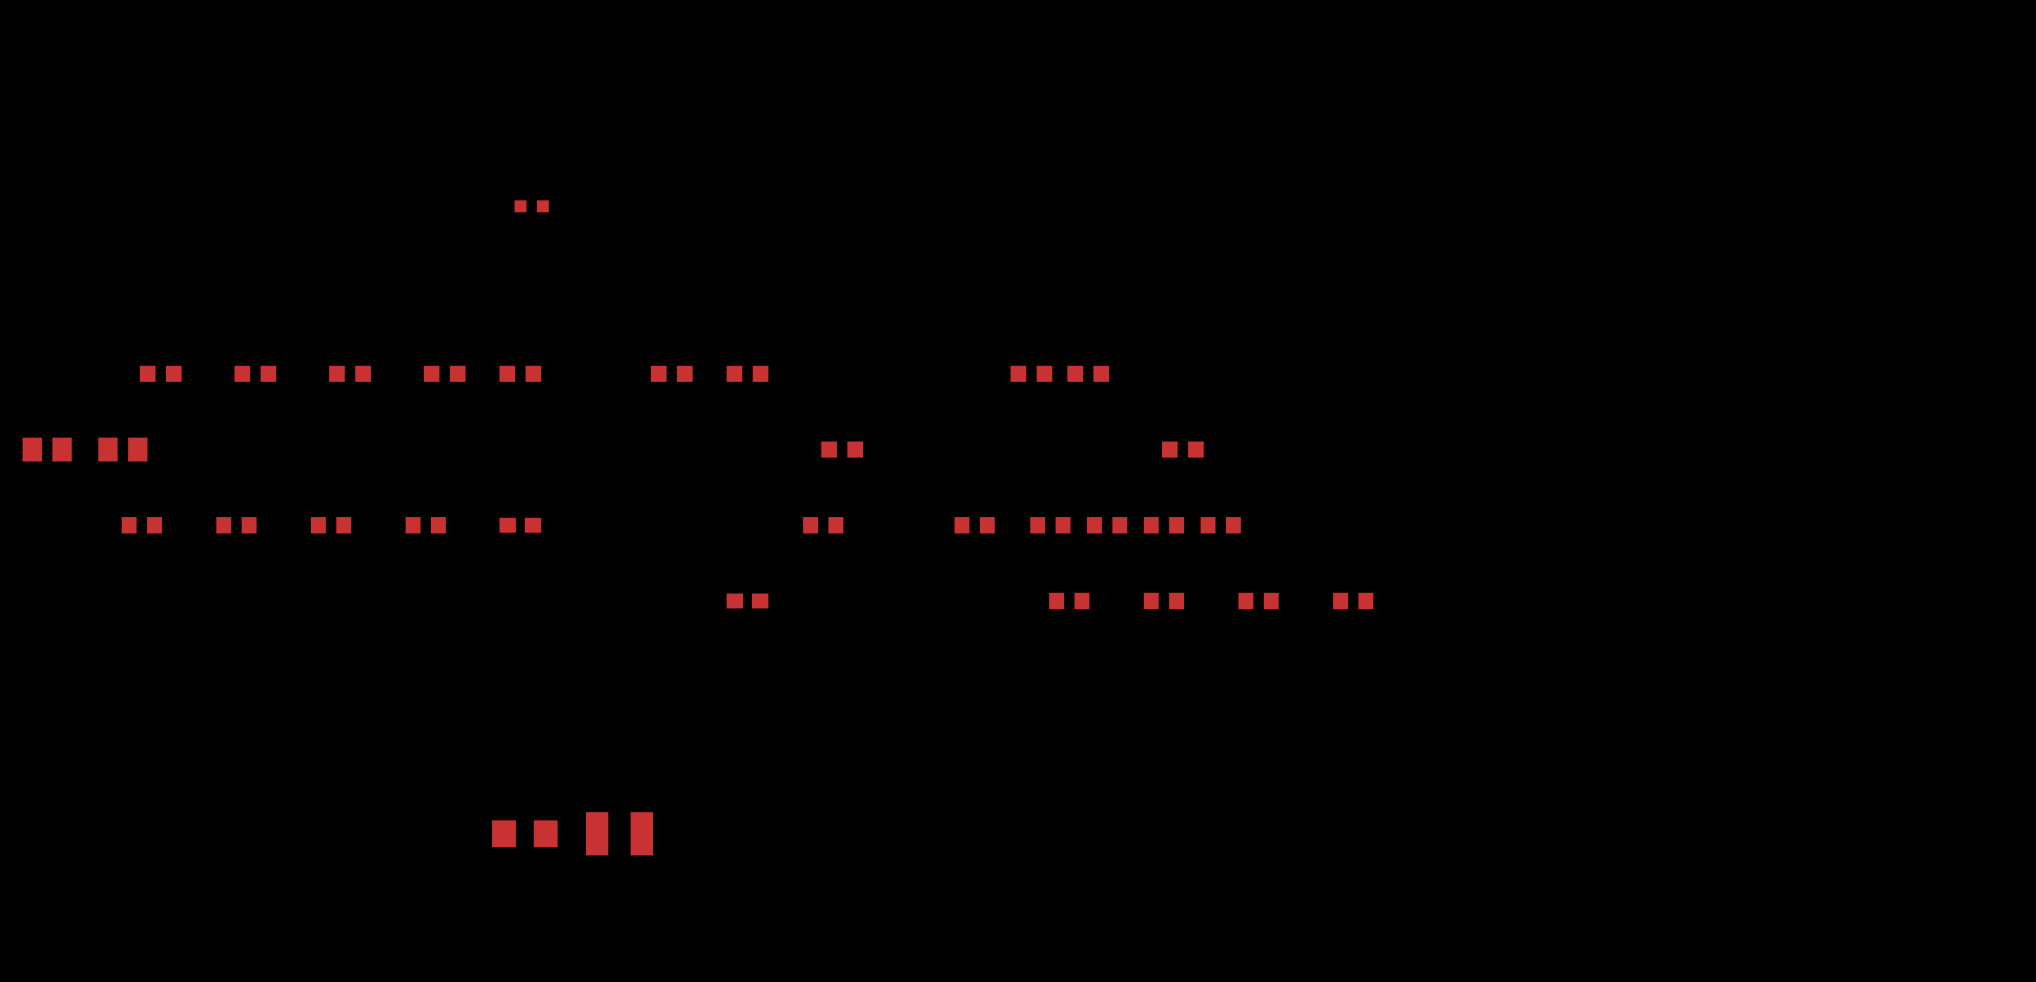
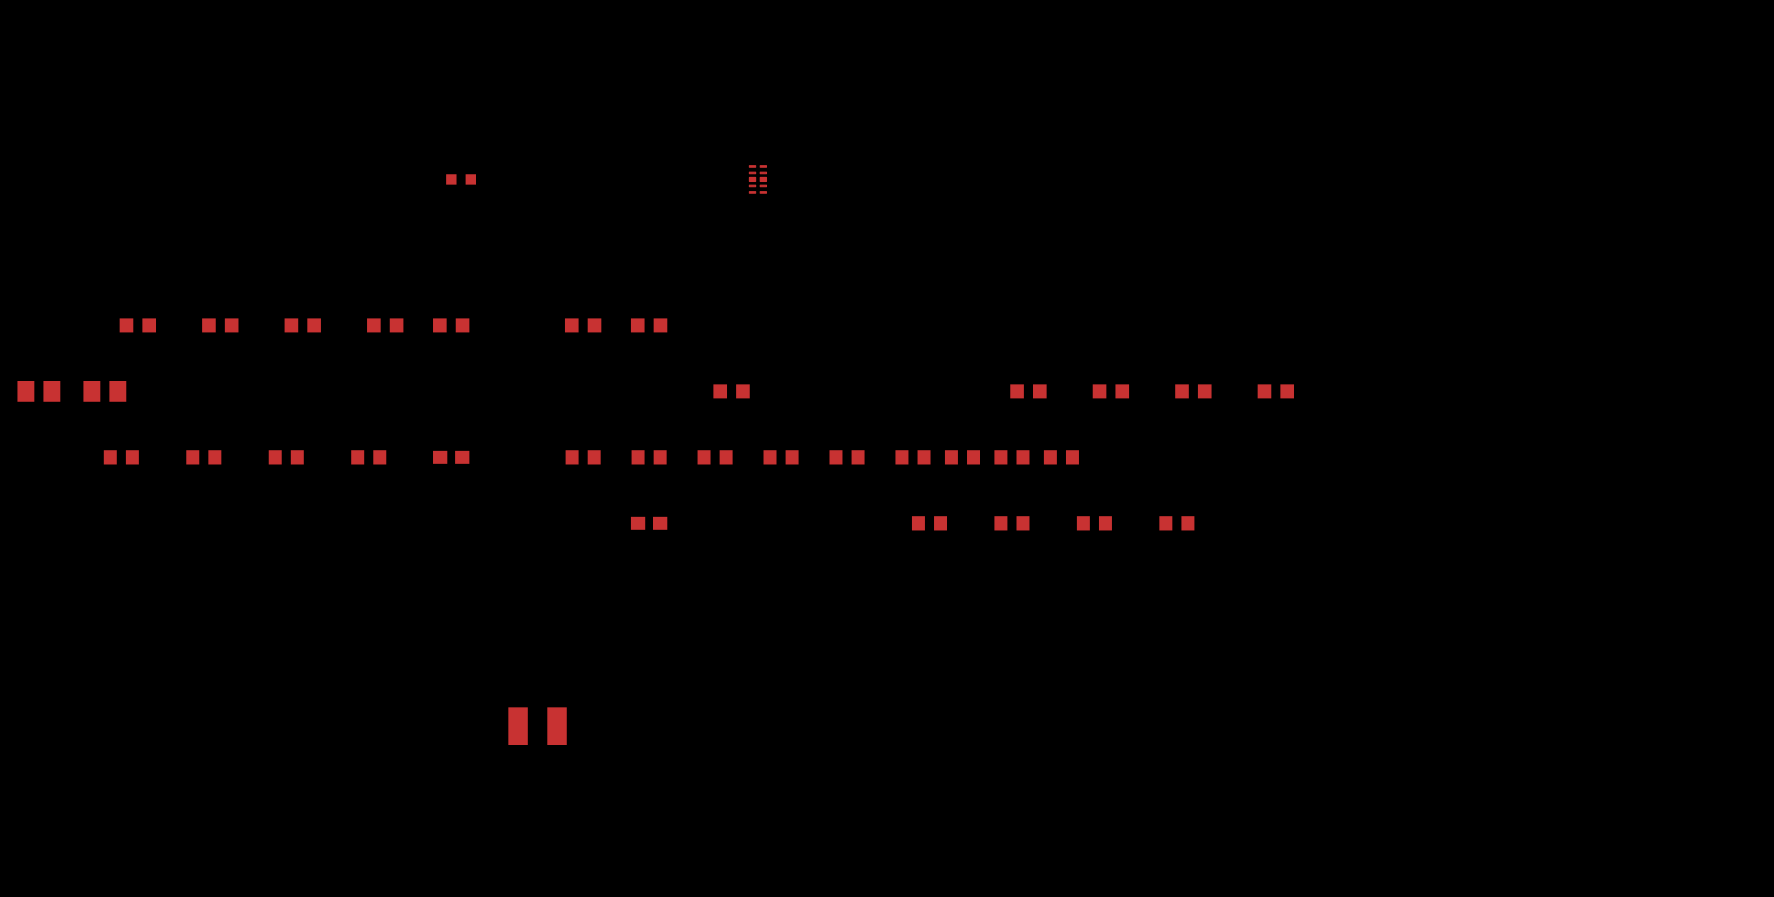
part: none -> (757, 179)
part: (1031, 373) -> none
part: (1088, 373) -> none
part: none -> (1110, 391)
part: none -> (1193, 391)
part: none -> (1275, 391)
part: none -> (583, 457)
part: none -> (649, 457)
part: none -> (781, 457)
part: (524, 833) -> none

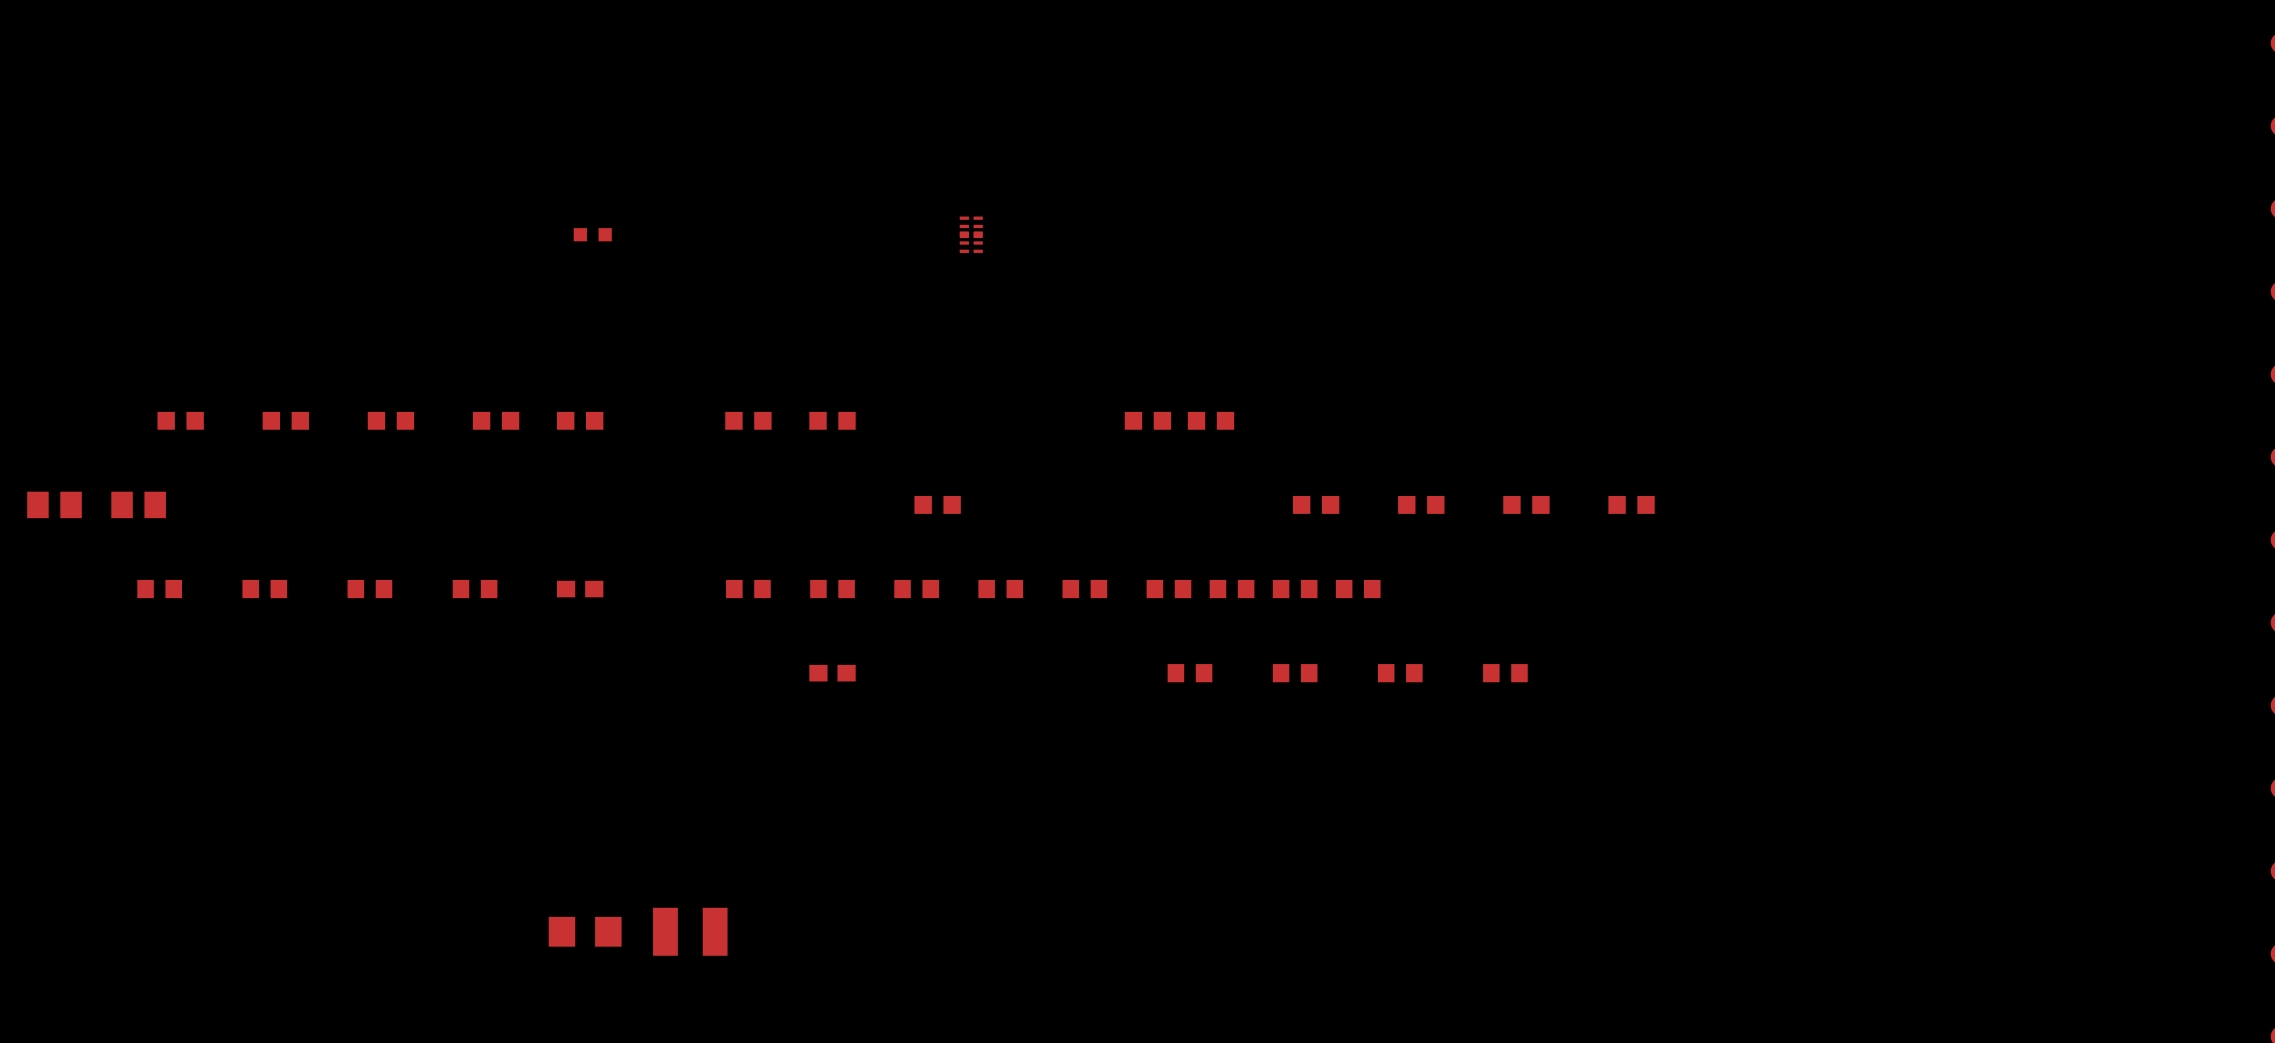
part: none -> (1147, 420)
part: none -> (1211, 420)
part: none -> (585, 931)

